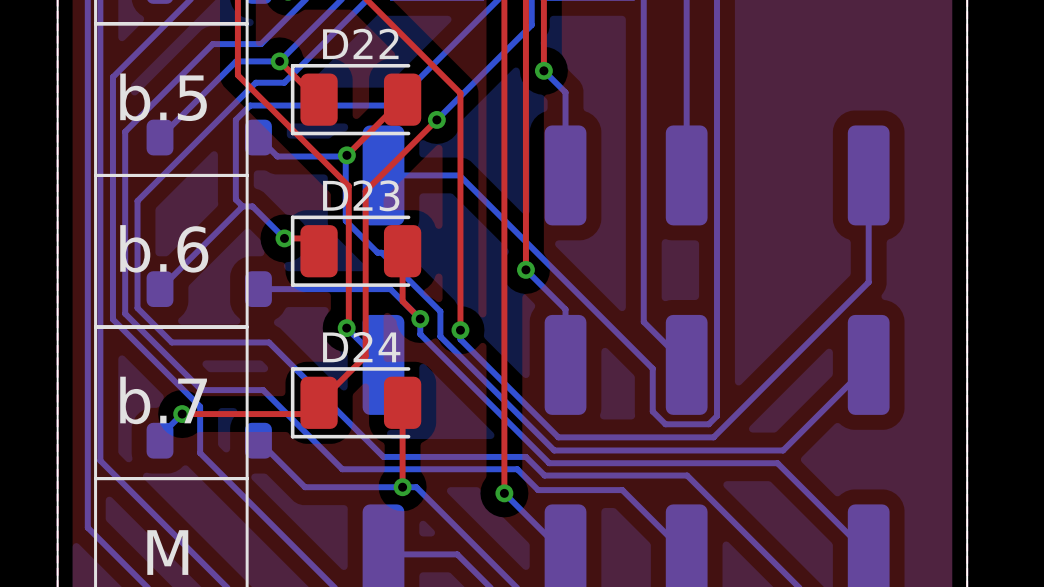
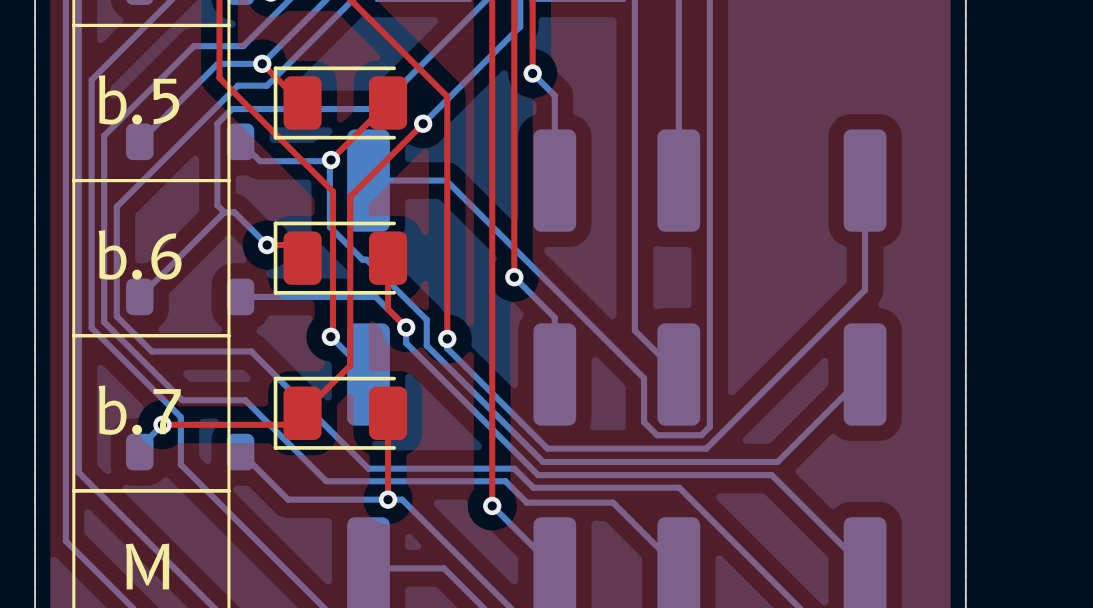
D22 name: D22 (360, 43) -> none
D23 name: D23 (361, 195) -> none
D24 name: D24 (361, 347) -> none

